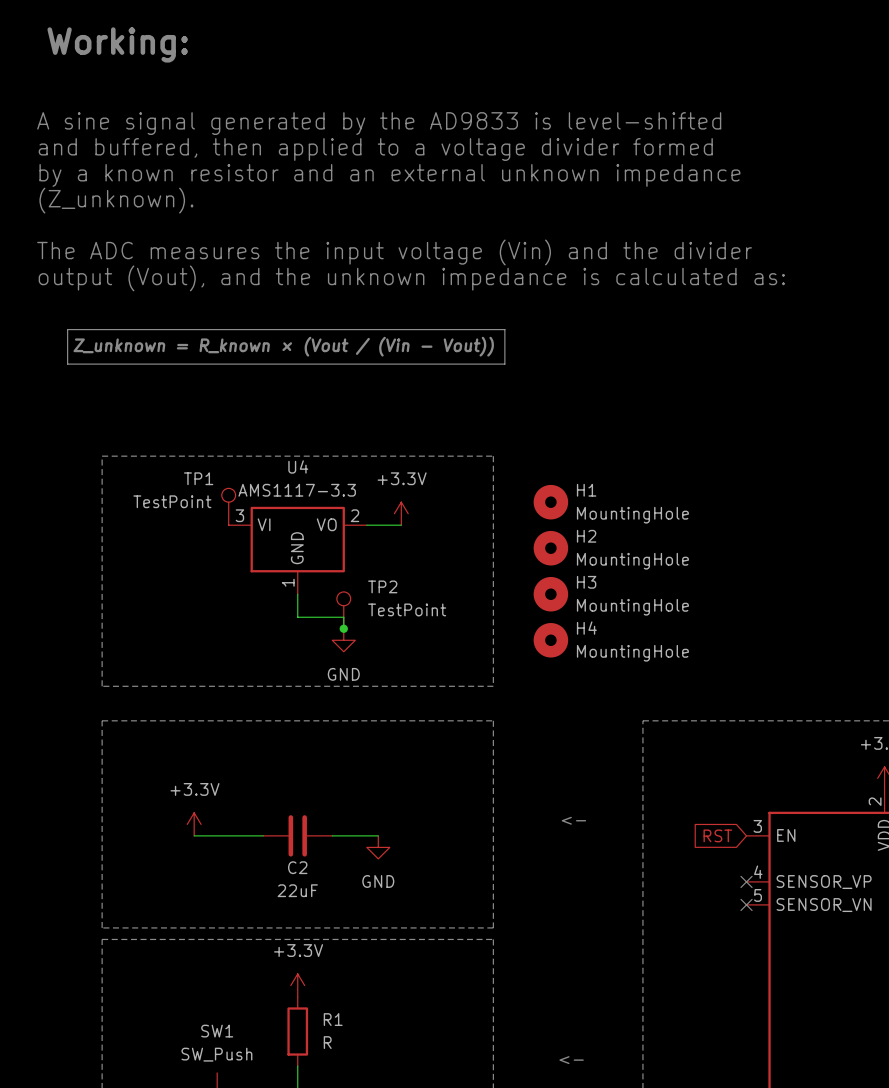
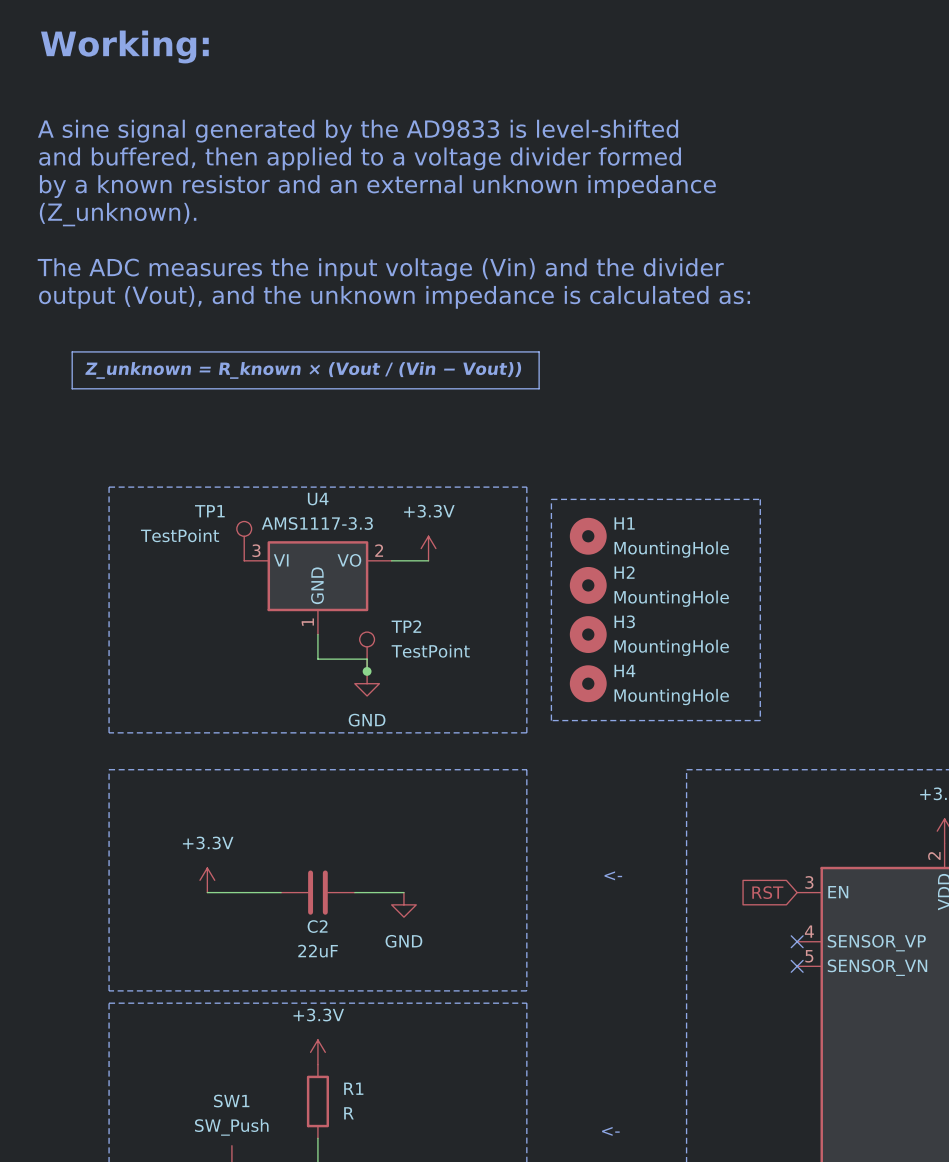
line: none -> (551, 499) (760, 499) (760, 720) (551, 720) (551, 499)

